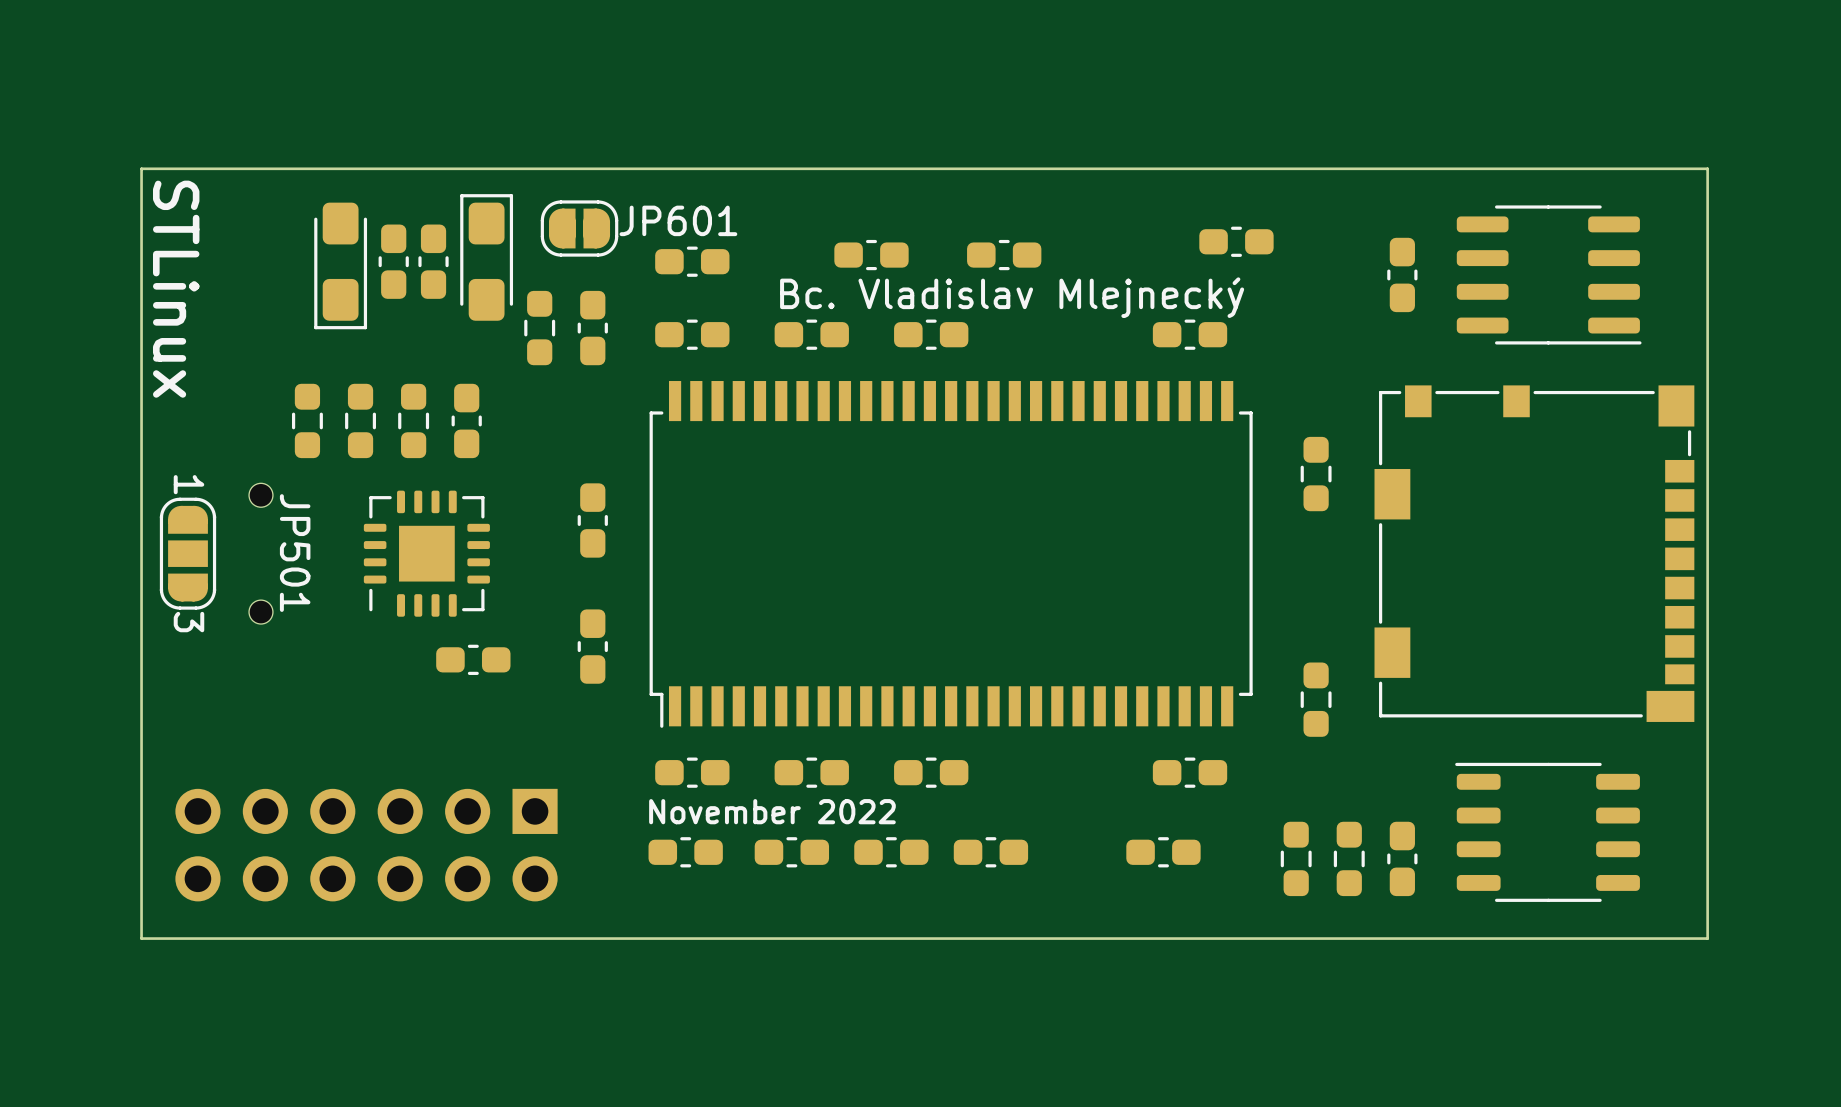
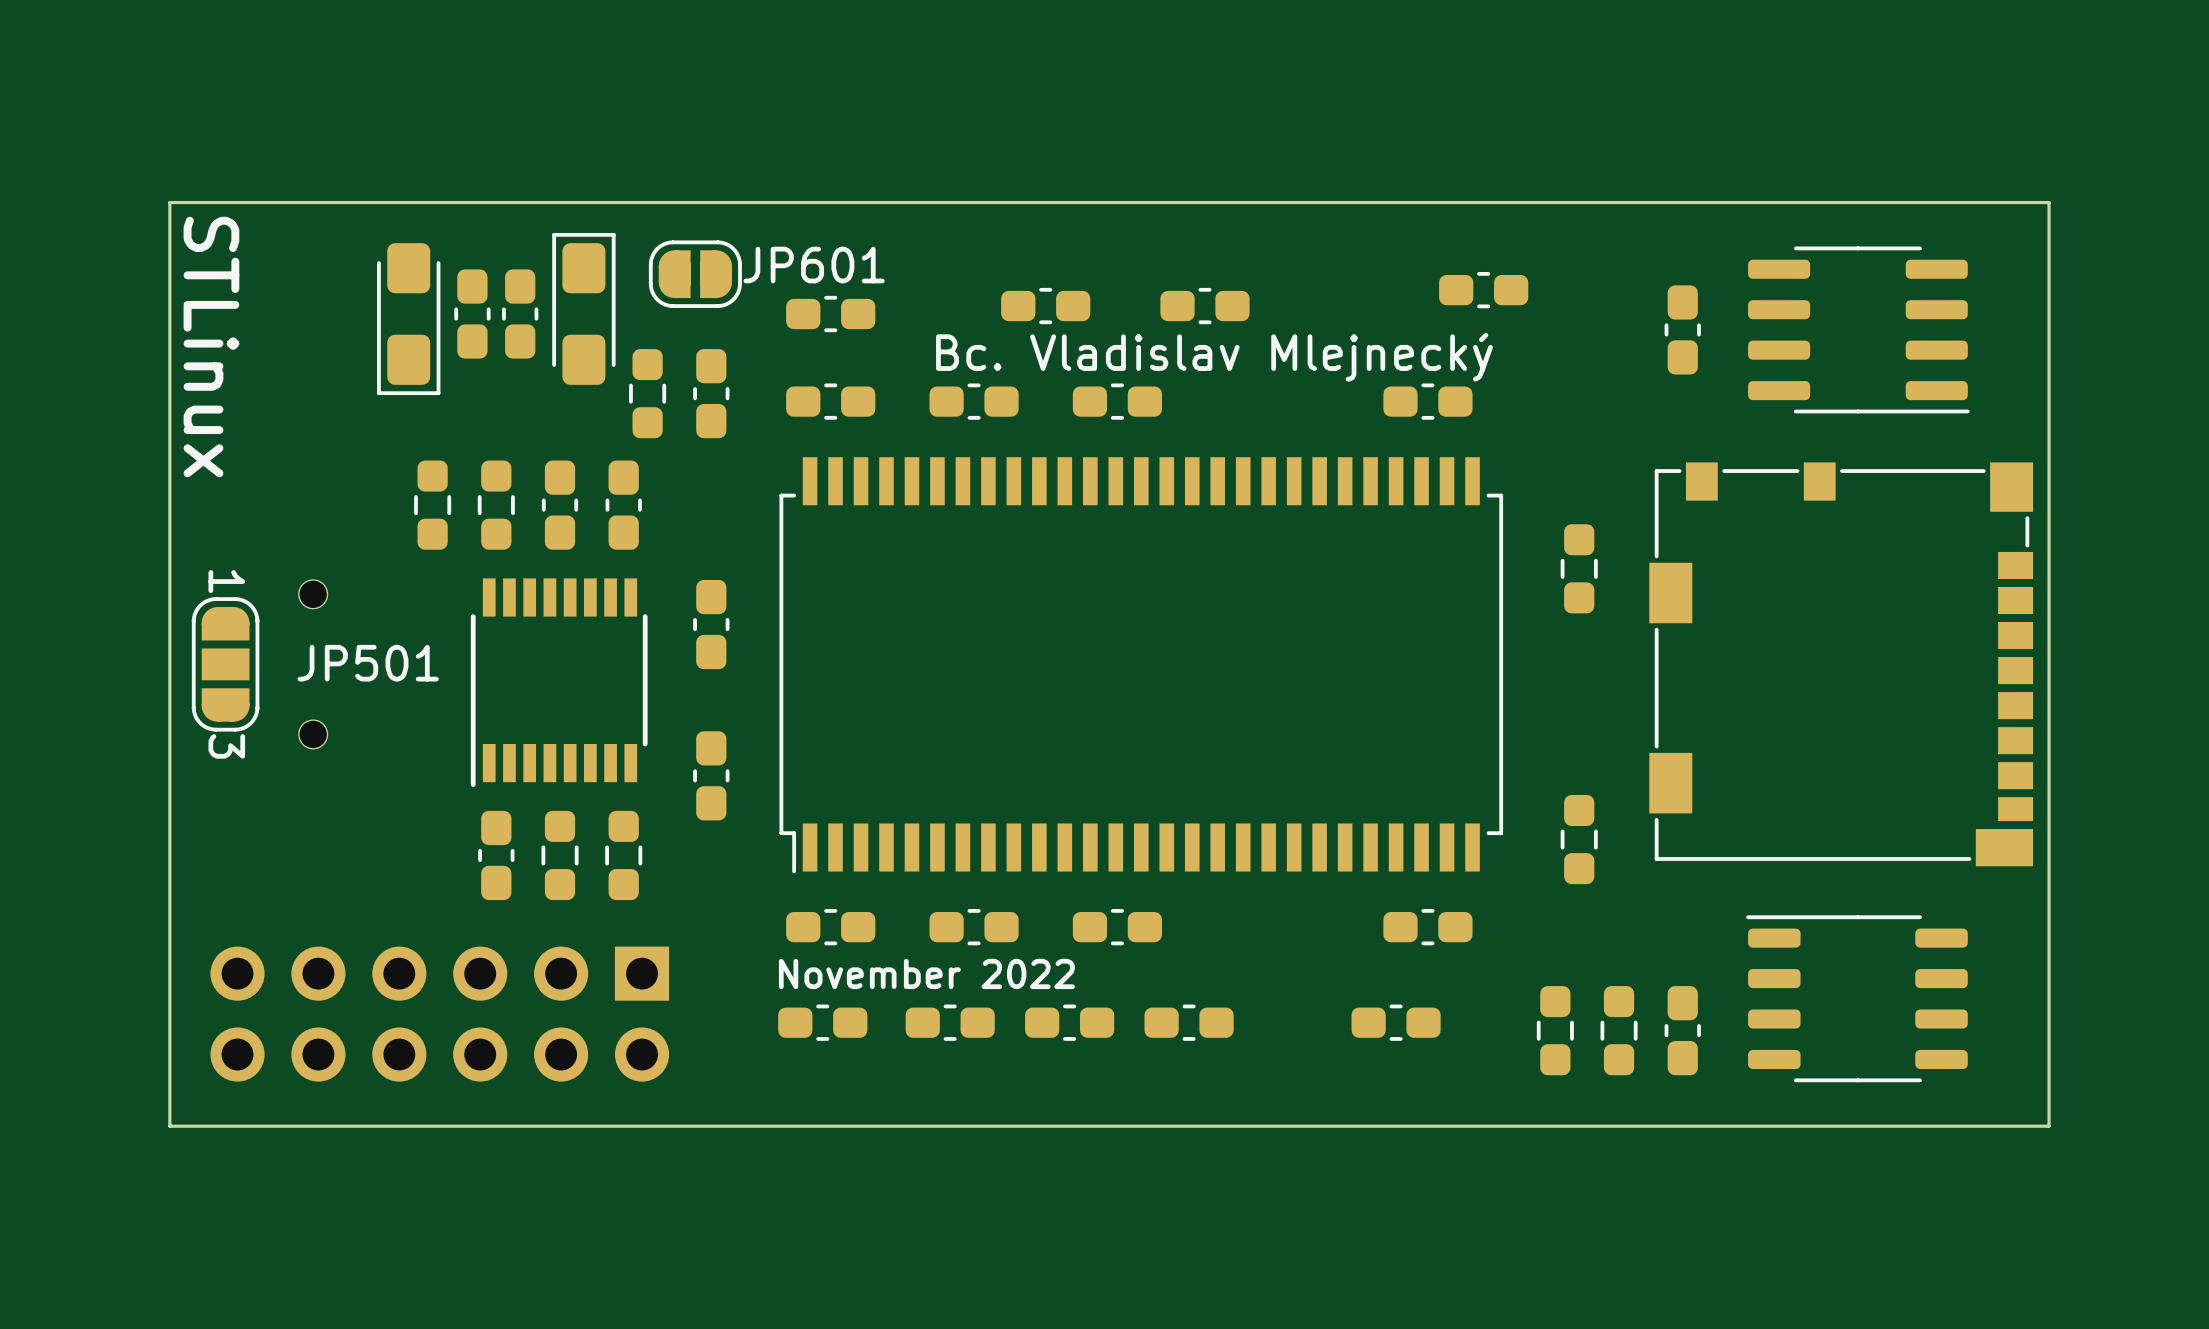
part: (307, 420) -> none
part: none -> (623, 505)
JP501 name rotation: 0° (295, 553) -> 90° counterclockwise (368, 663)
part: (426, 553) -> none
part: none -> (559, 682)
part rotation: 0° (473, 659) -> 90° clockwise (496, 855)
part position: (473, 659) -> (496, 855)
part: none -> (560, 855)
part: none -> (623, 855)

